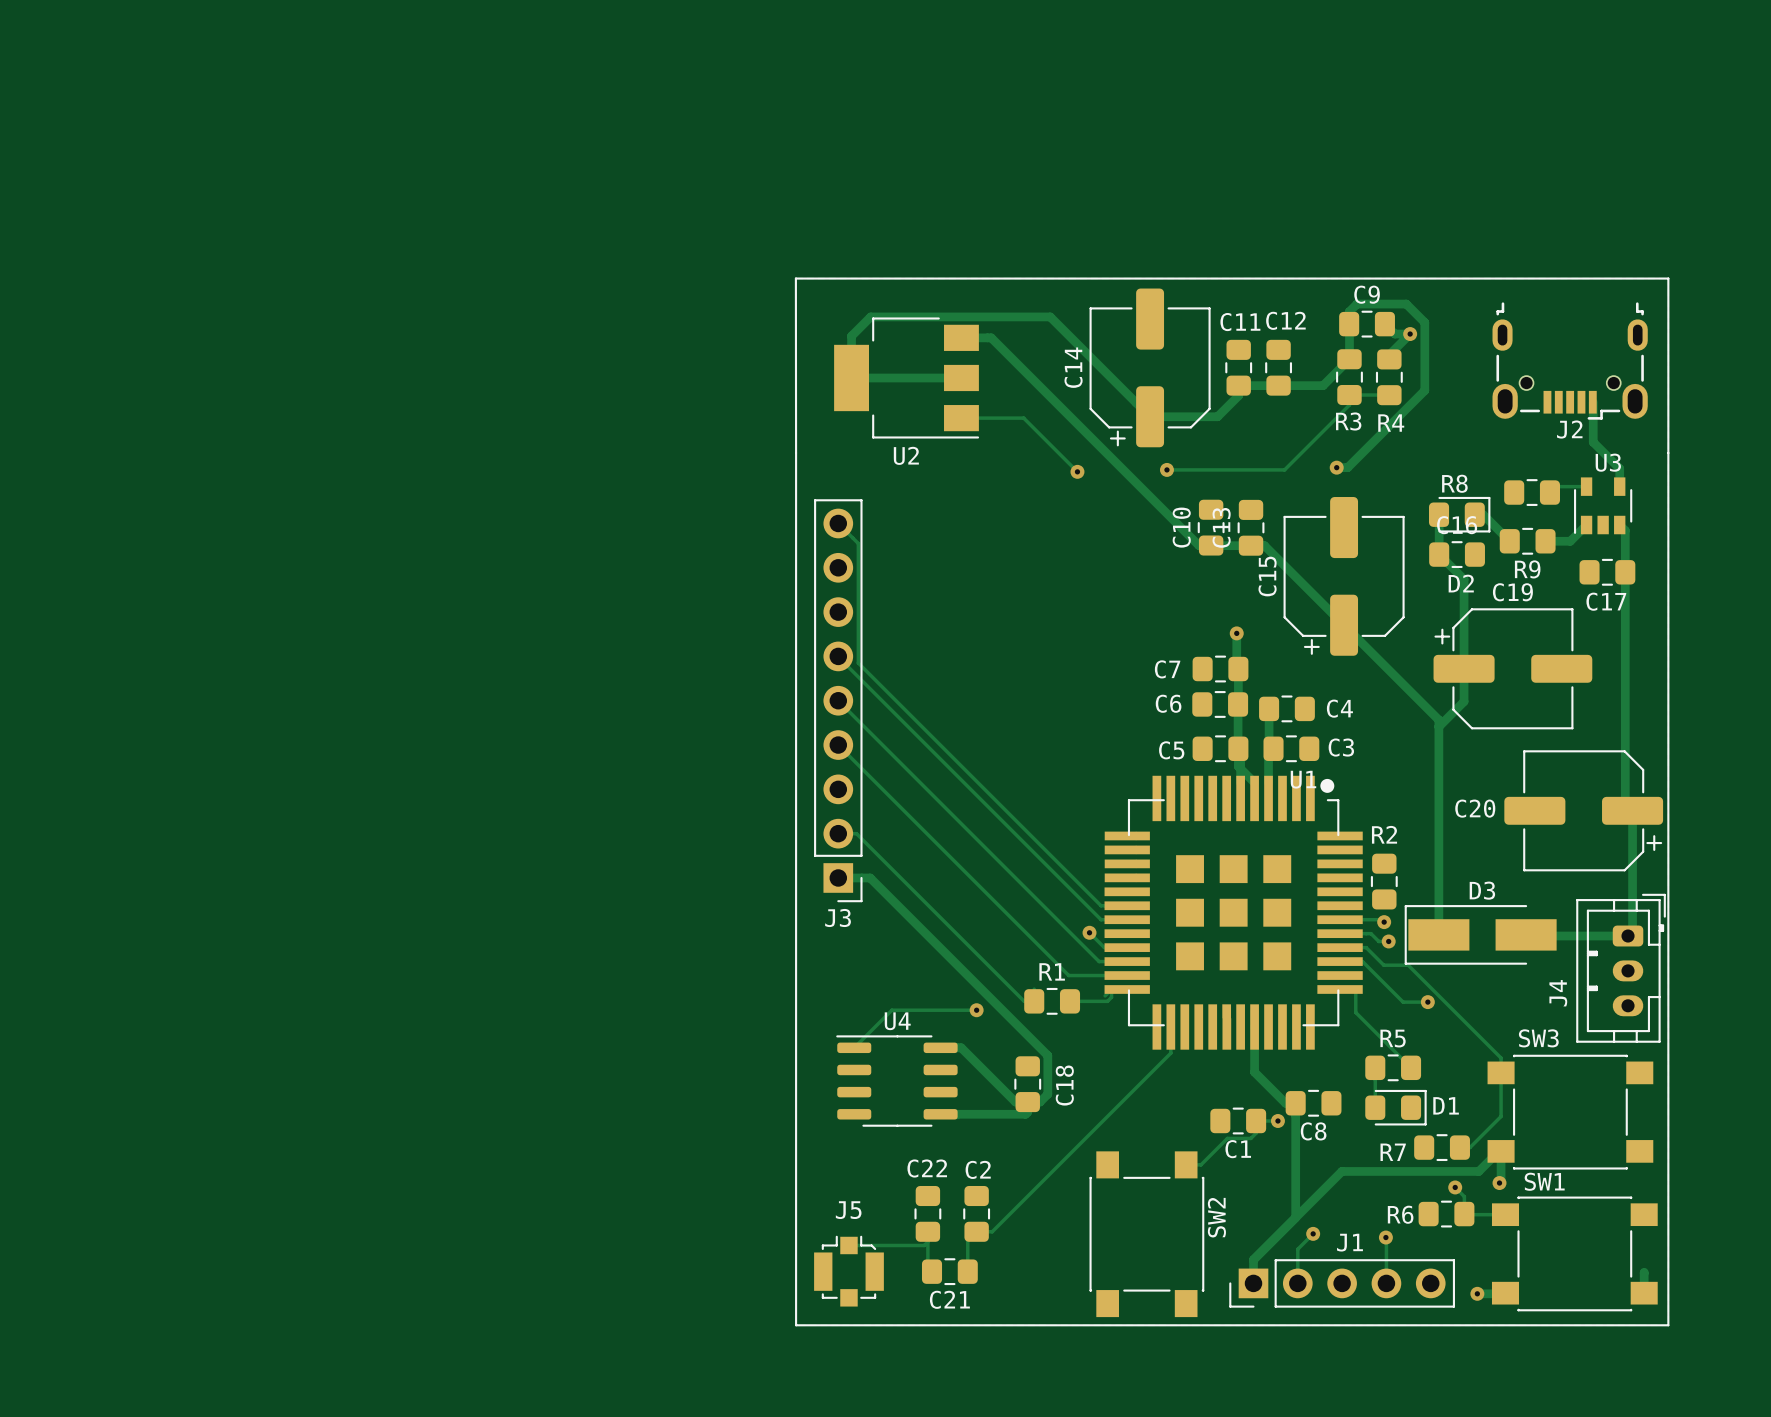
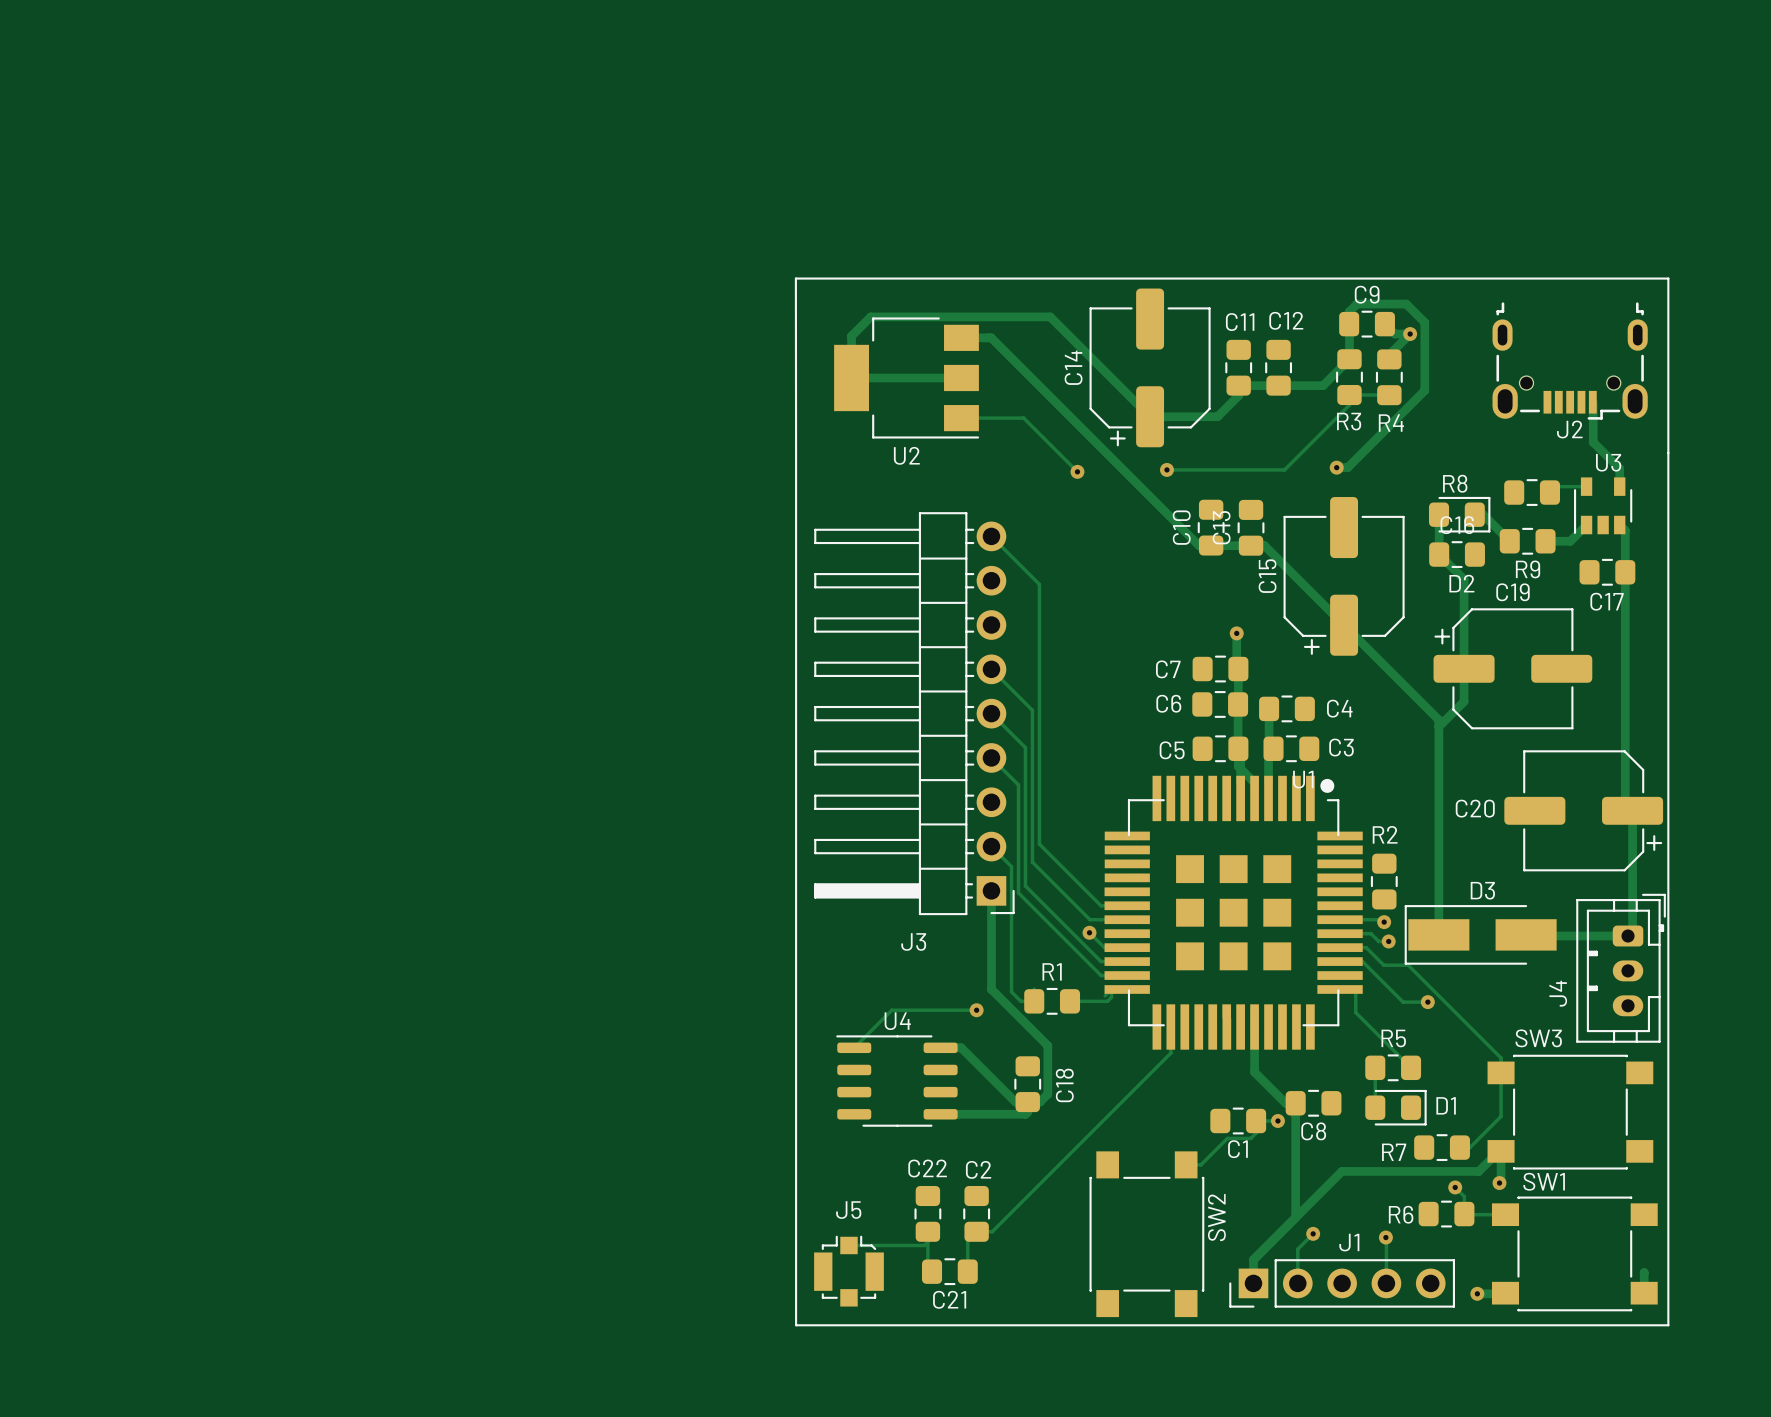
J3 footprint: [814, 499, 863, 903] -> [814, 512, 1015, 916]
track: (838, 523) (858, 543) (858, 663) (1039, 844) -> (991, 536) (1039, 584) (1039, 844)
track: (838, 656) (1101, 919) -> (991, 669) (1032, 710) (1032, 862) (1089, 919) (1101, 919)
track: (838, 700) (1101, 961) -> (991, 713) (1025, 747) (1025, 886) (1101, 961)
track: (838, 745) (1068, 975) (1101, 975) -> (991, 757) (1018, 784) (1018, 892) (1101, 975)
track: (838, 833) (856, 833) (1024, 1001) -> (991, 846) (1011, 866) (1011, 991) (1020, 1001) (1024, 1001)
track: (838, 877) (870, 877) (1047, 1055) -> (991, 890) (991, 989) (1047, 1045) (1047, 1055)

